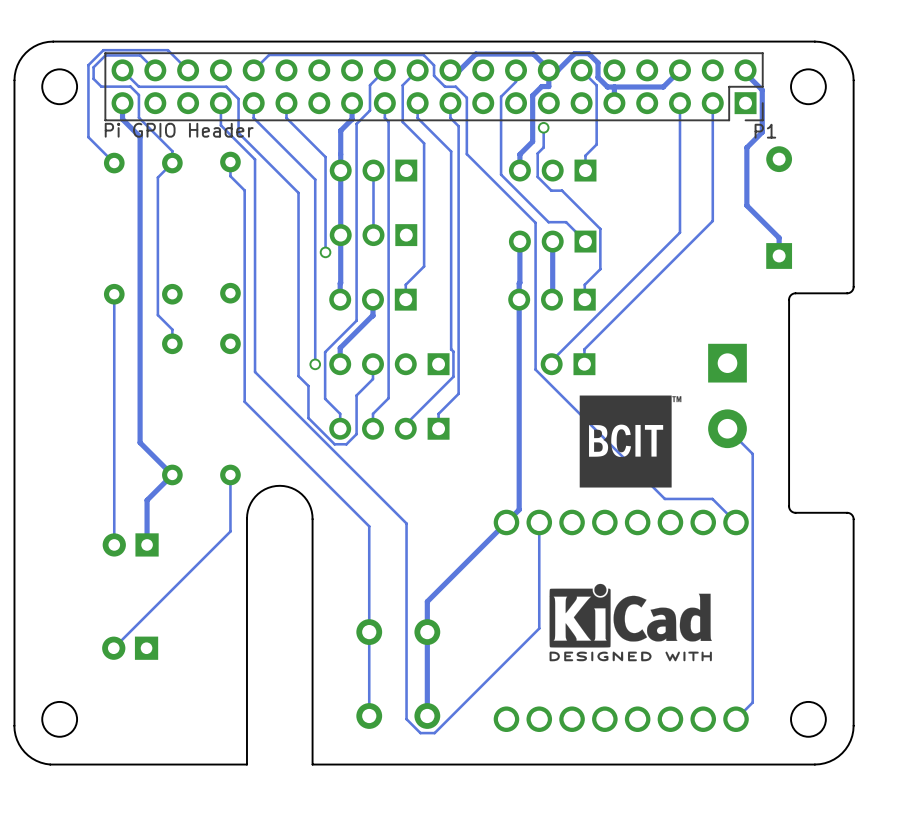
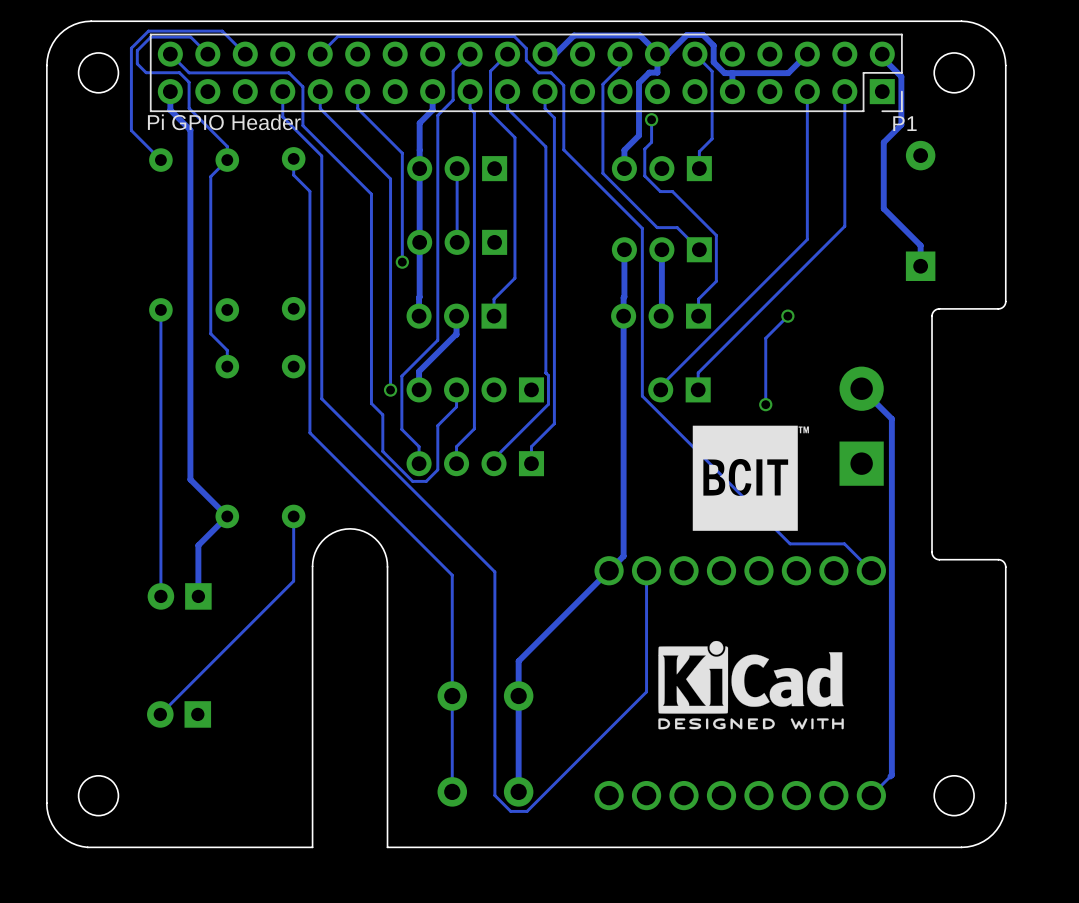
track: none -> (787, 316) (765, 338) (765, 404)
via: none -> (787, 316)
via: none -> (765, 404)
part rotation: 0° (727, 395) -> 180° (861, 426)
track: (727, 428) (752, 453) (752, 702) -> (861, 388) (891, 418) (890, 776)

